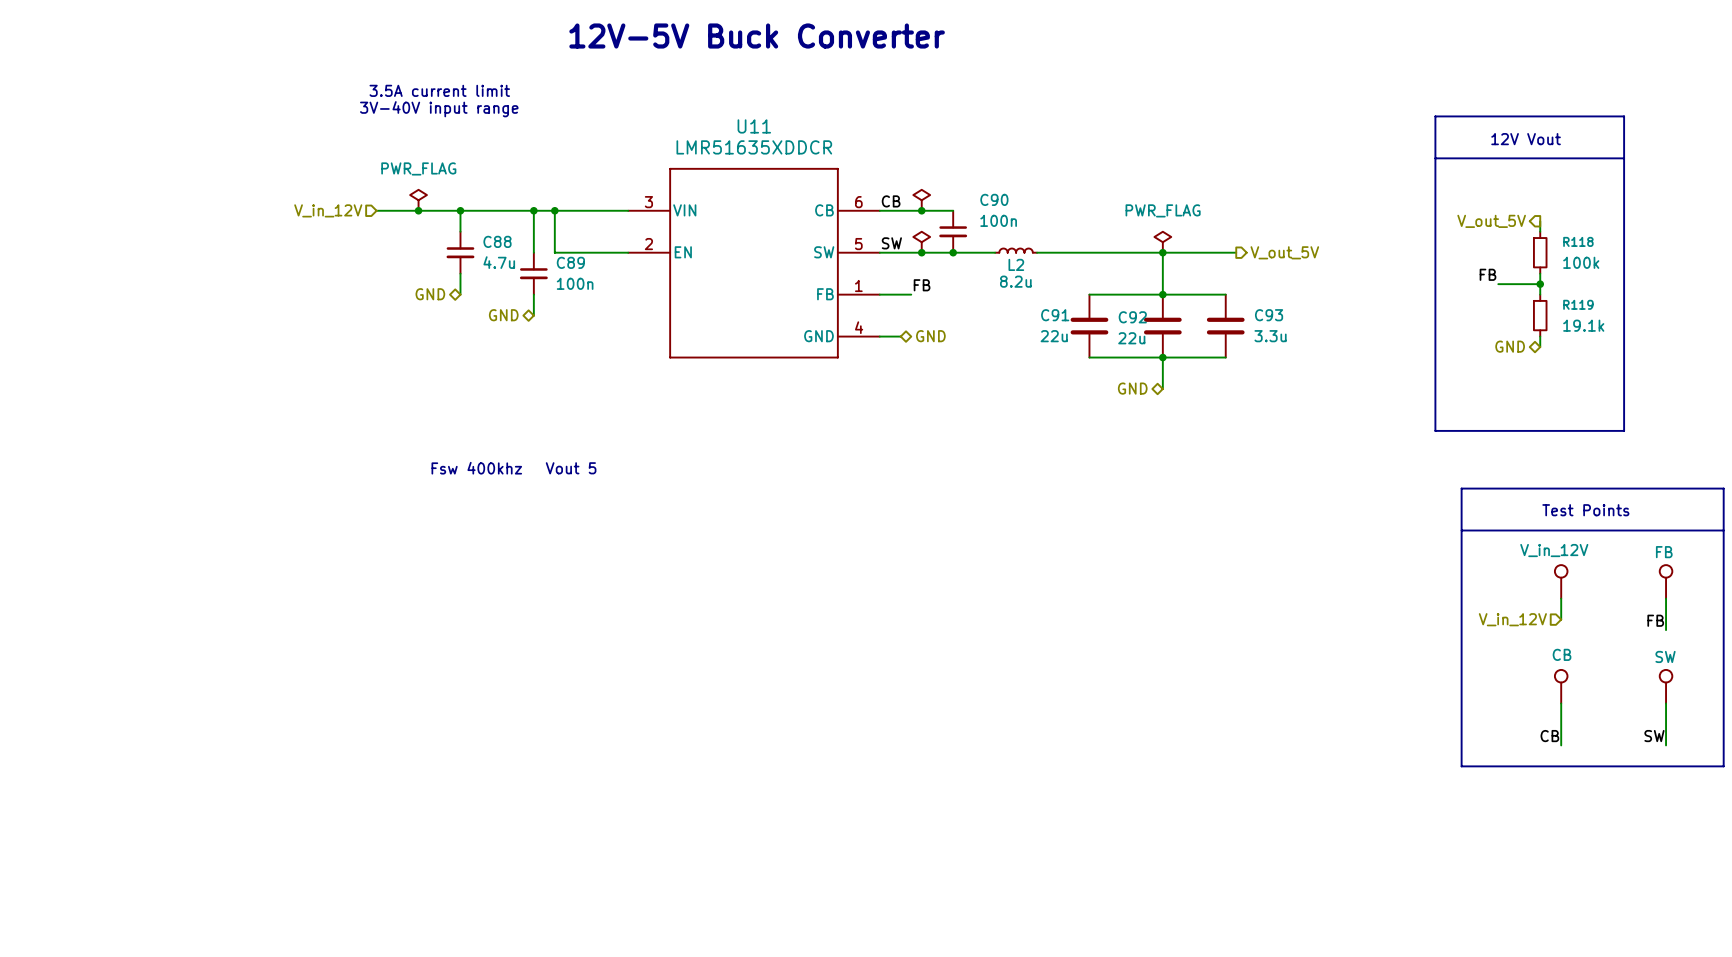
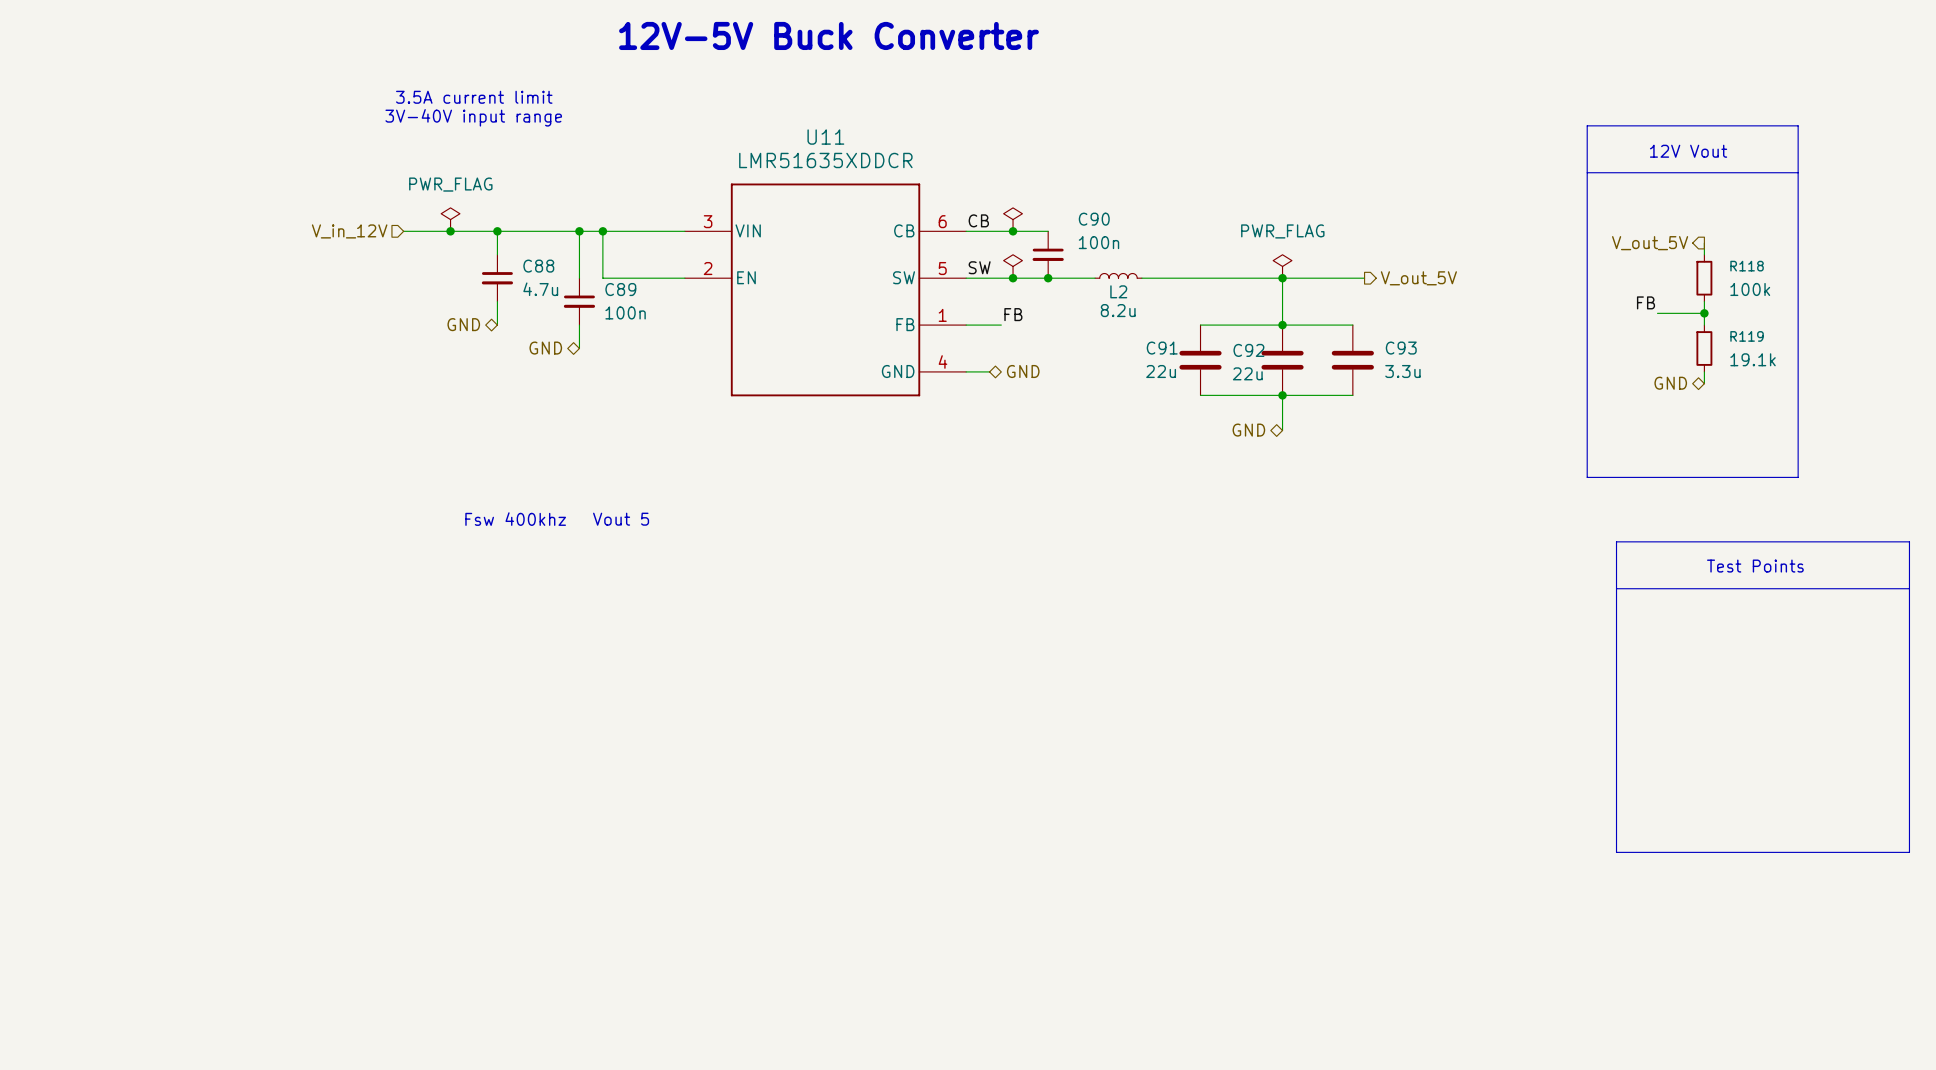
part: V_in_12V (1561, 581) -> none
part: FB (1666, 581) -> none
wire: (1561, 598) (1561, 619) -> none
wire: (1666, 598) (1666, 630) -> none
hierarchical label: V_in_12V (1512, 619) -> none
label: FB (1655, 620) -> none
part: CB (1561, 686) -> none
part: SW (1666, 686) -> none
wire: (1561, 703) (1561, 745) -> none
wire: (1666, 703) (1666, 745) -> none
label: CB (1549, 736) -> none
label: SW (1654, 736) -> none

